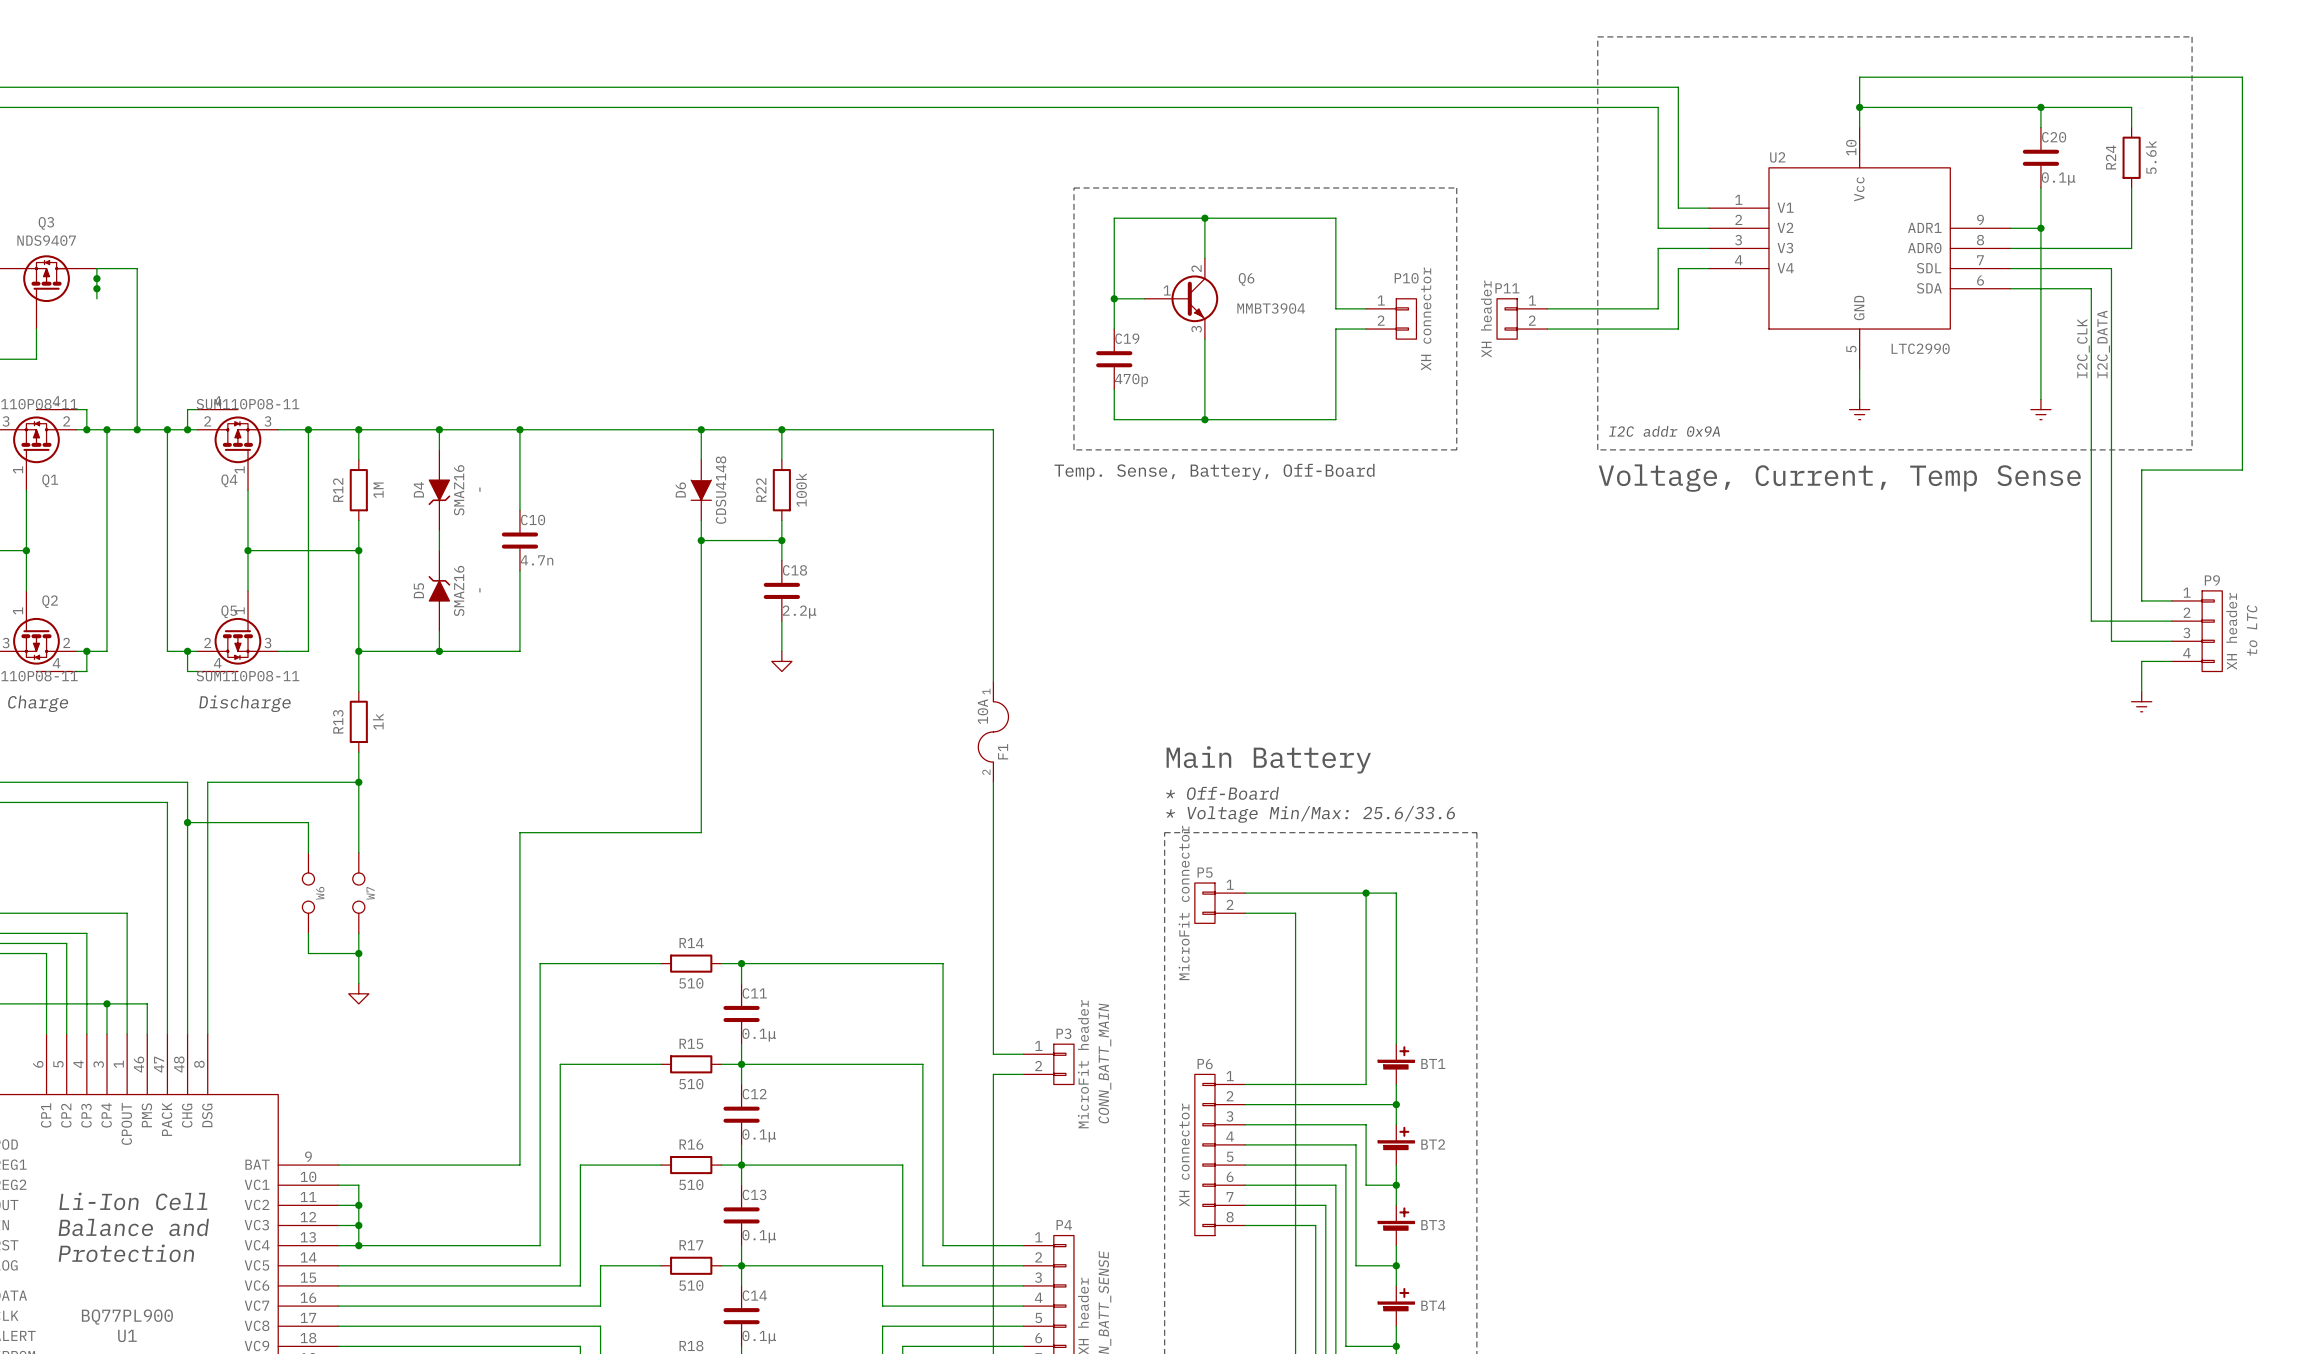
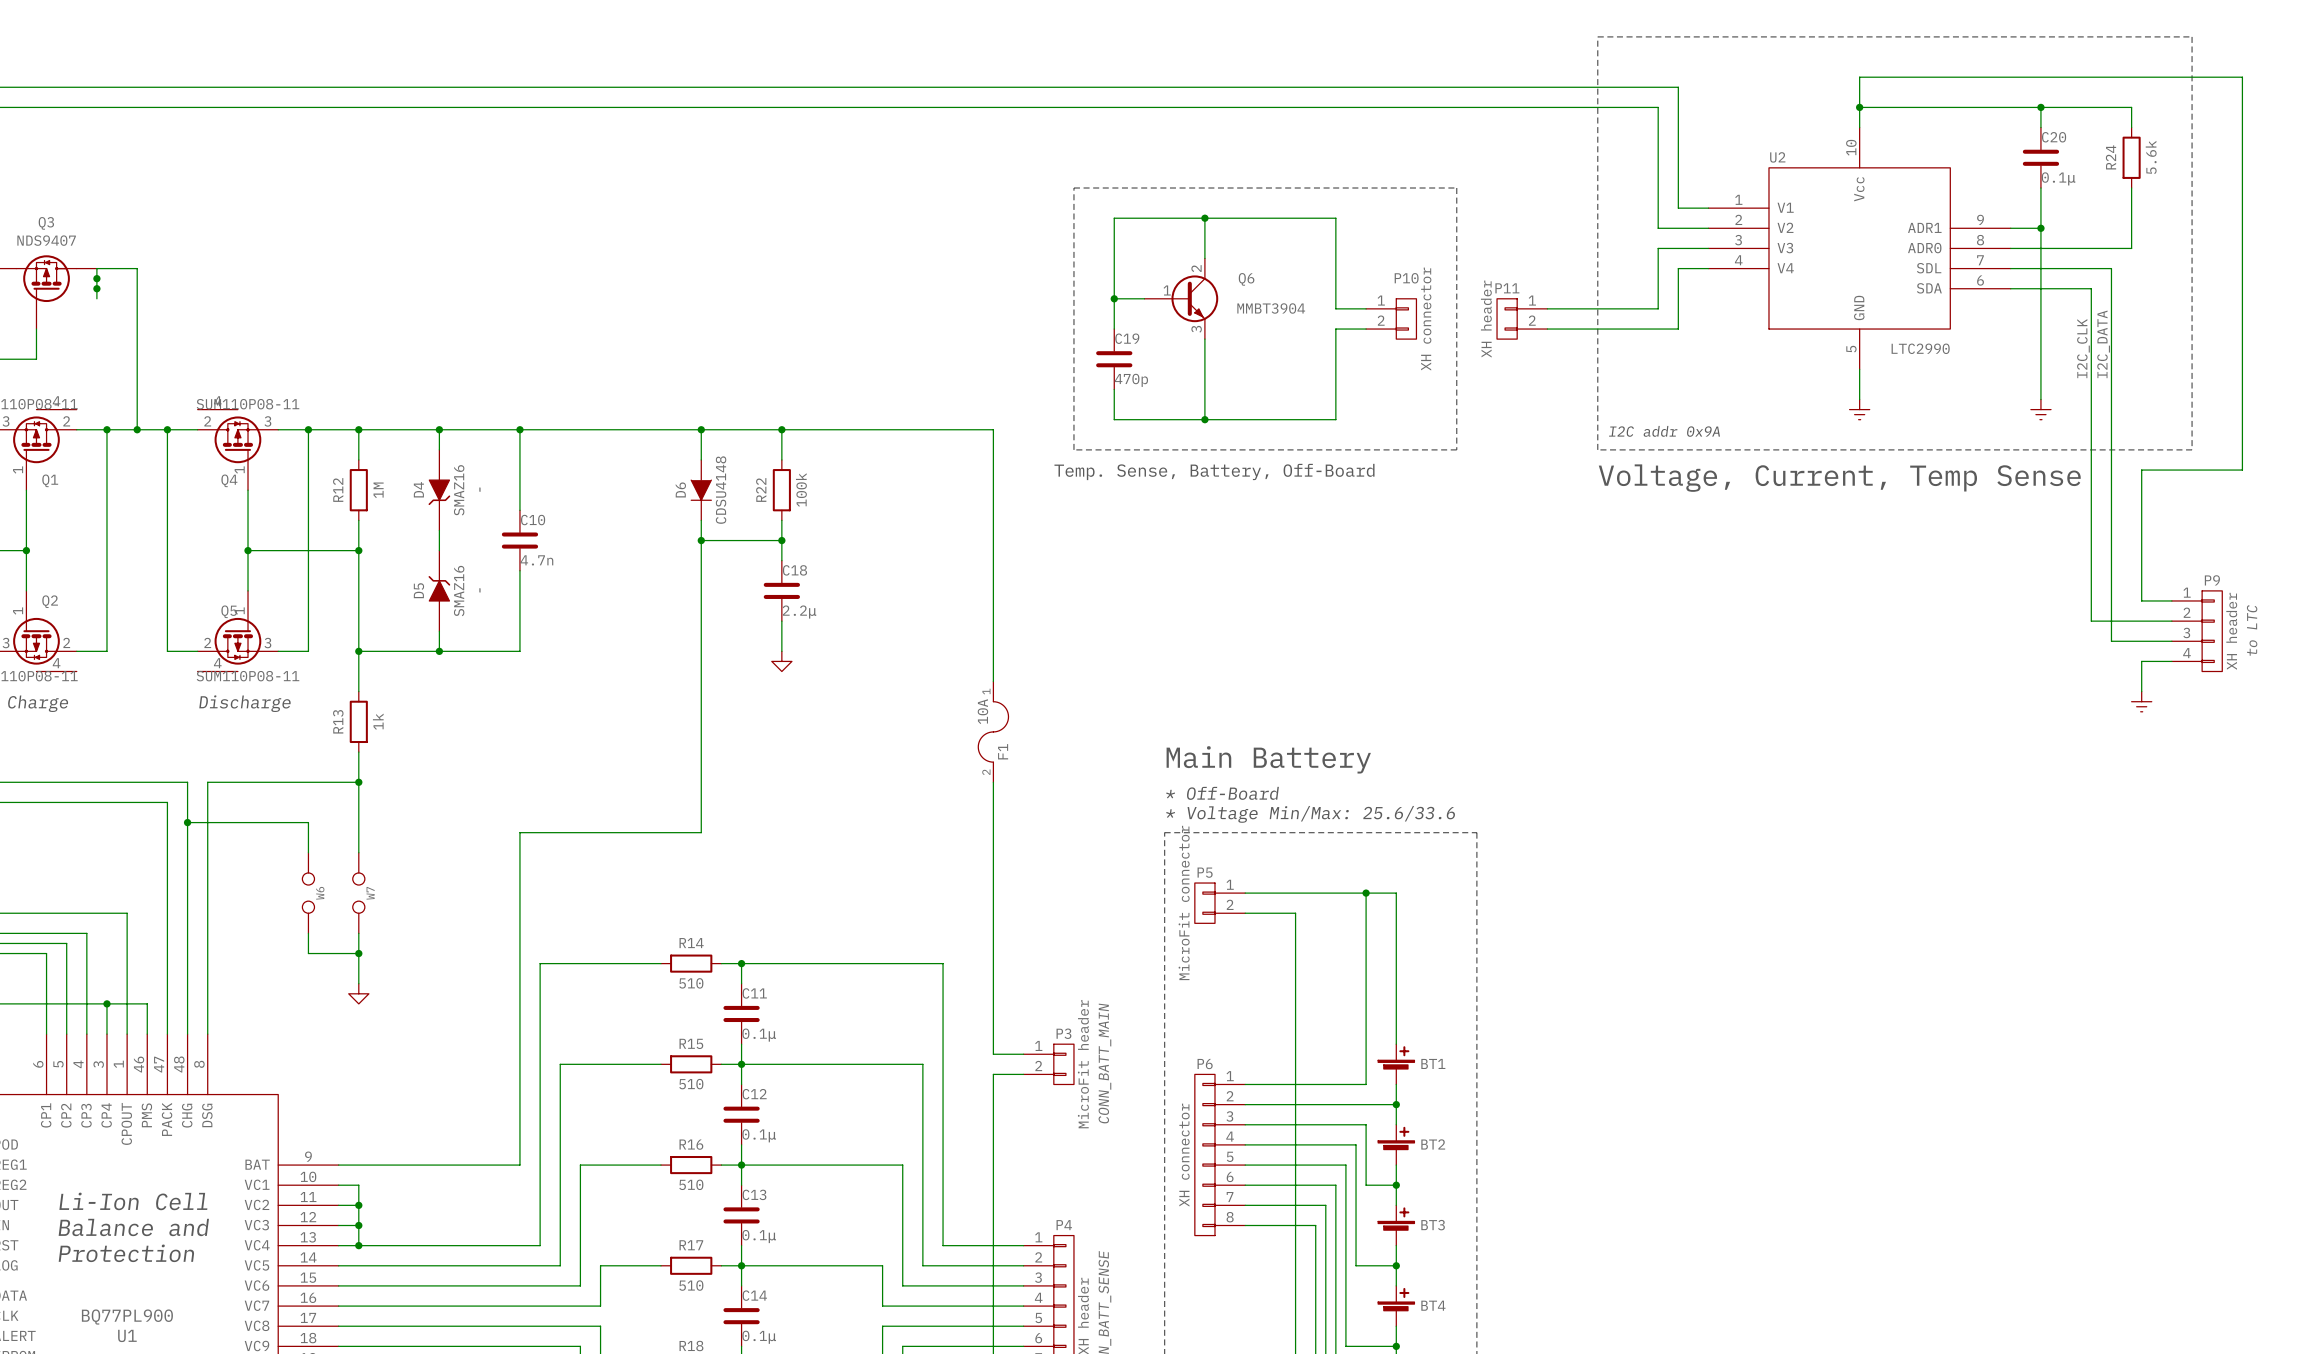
wire: (76, 409) (86, 409) (86, 429) -> none
wire: (197, 409) (187, 409) (187, 429) -> none
junction: (86, 429) -> none
junction: (187, 429) -> none
wire: (86, 651) (86, 671) (76, 671) -> none
junction: (86, 651) -> none
wire: (187, 651) (187, 671) (197, 671) -> none
junction: (187, 651) -> none

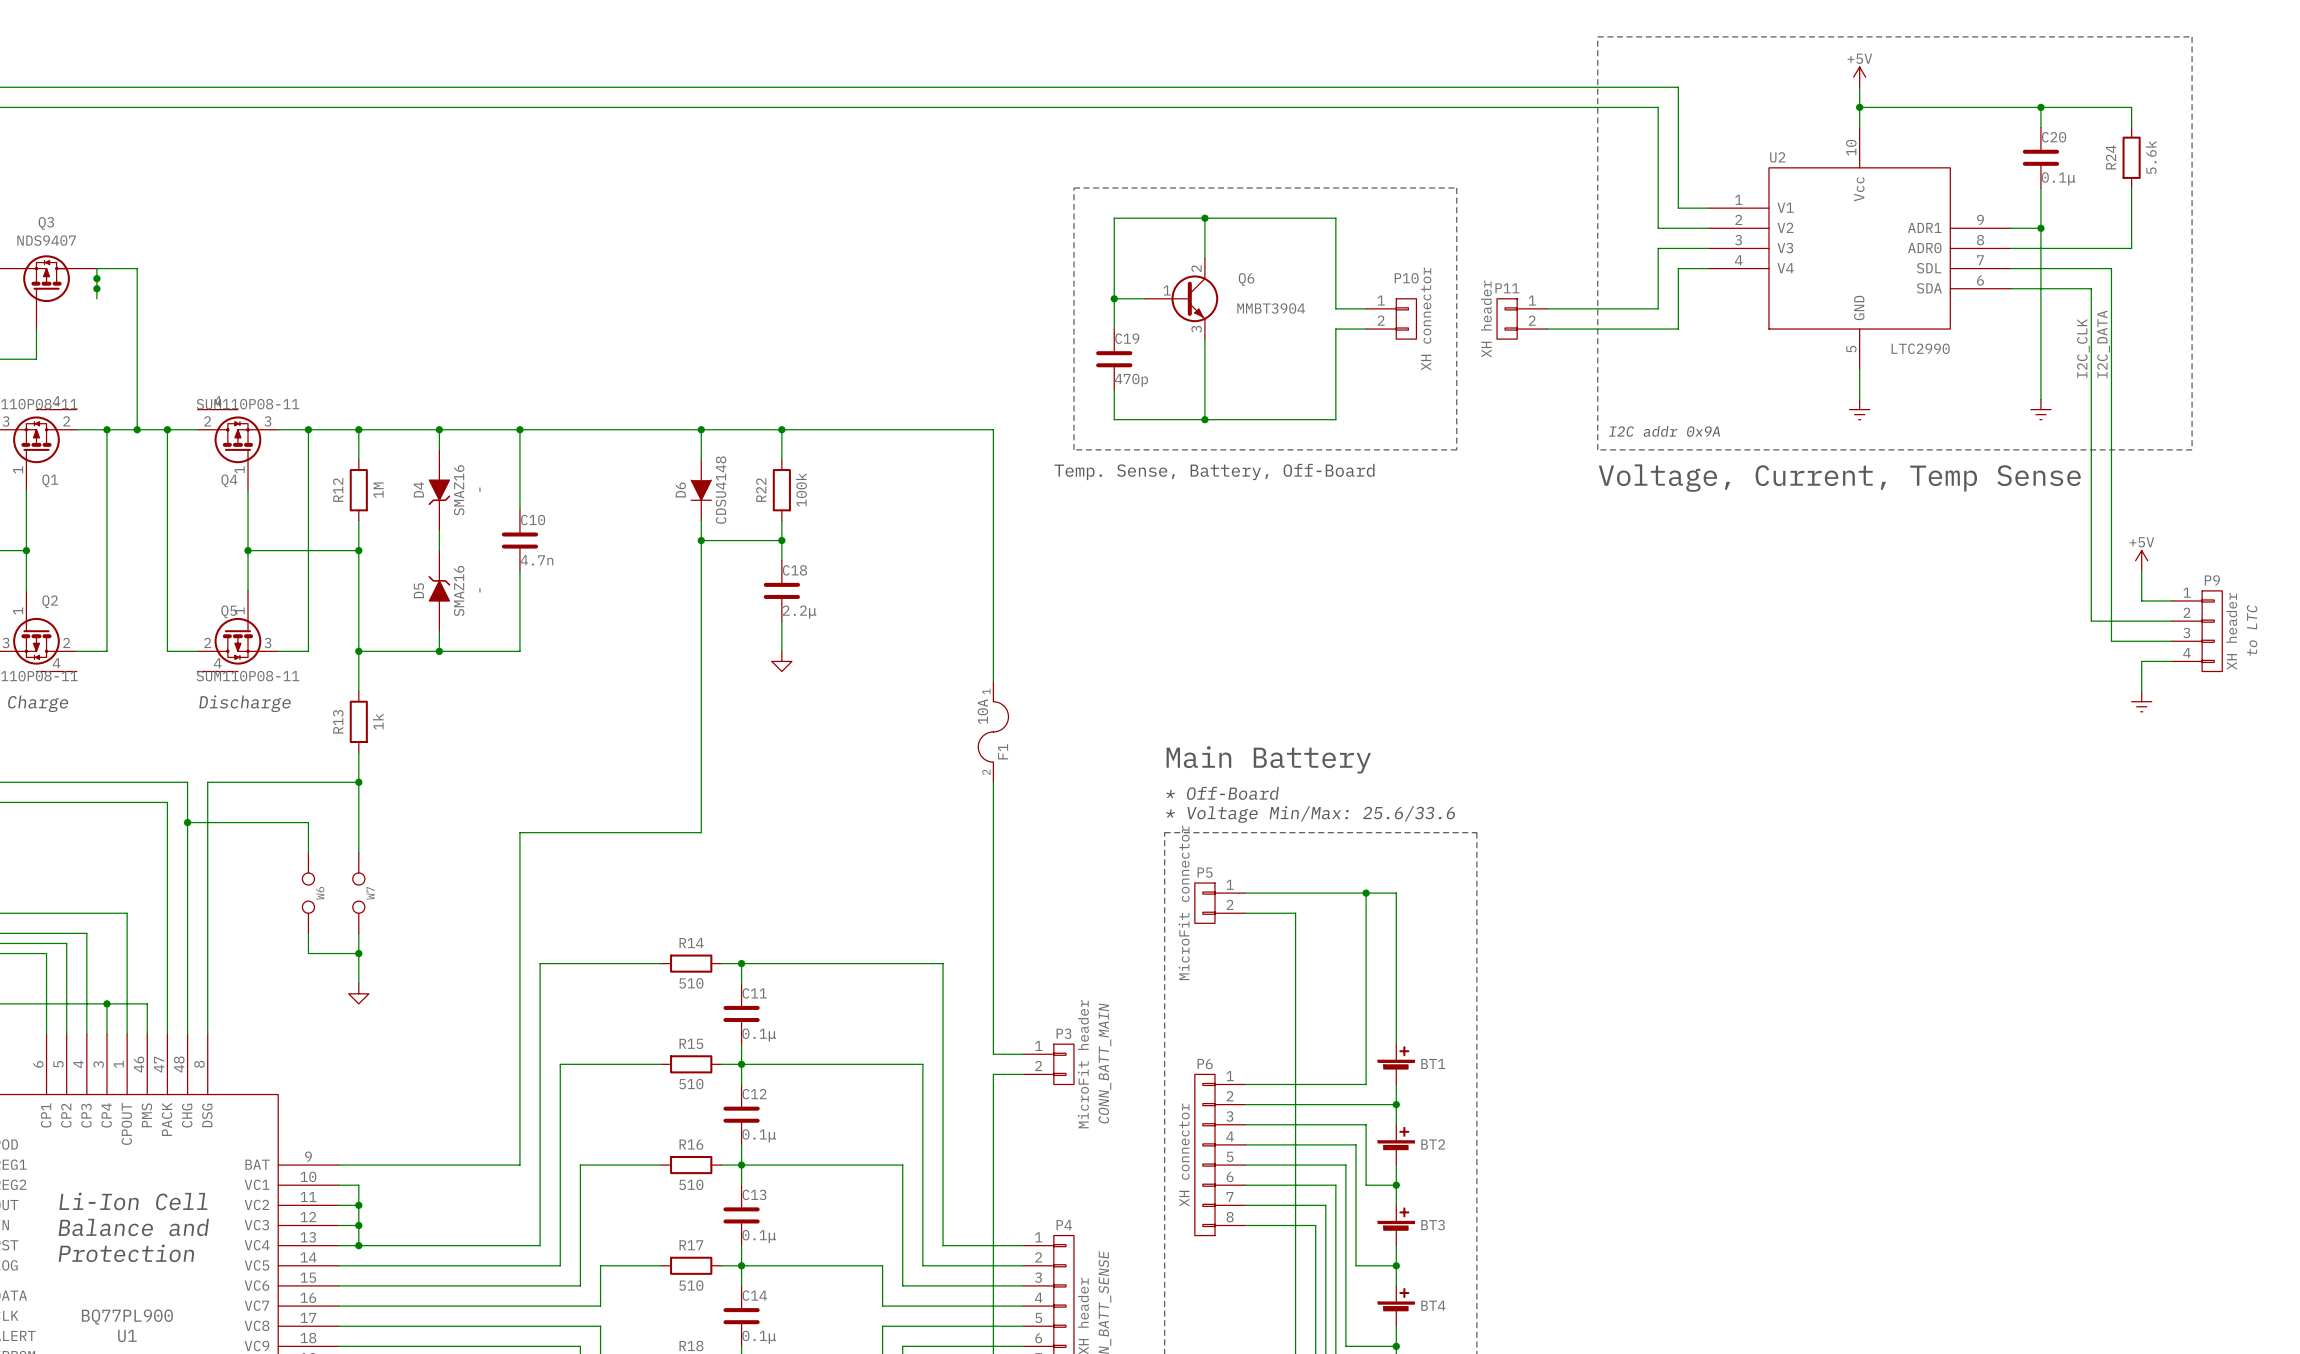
power symbol: none -> +5V (1859, 77)
wire: (1859, 87) (1859, 77) (2242, 77) (2242, 470) (2141, 470) (2141, 570) -> none
power symbol: none -> +5V (2141, 560)

